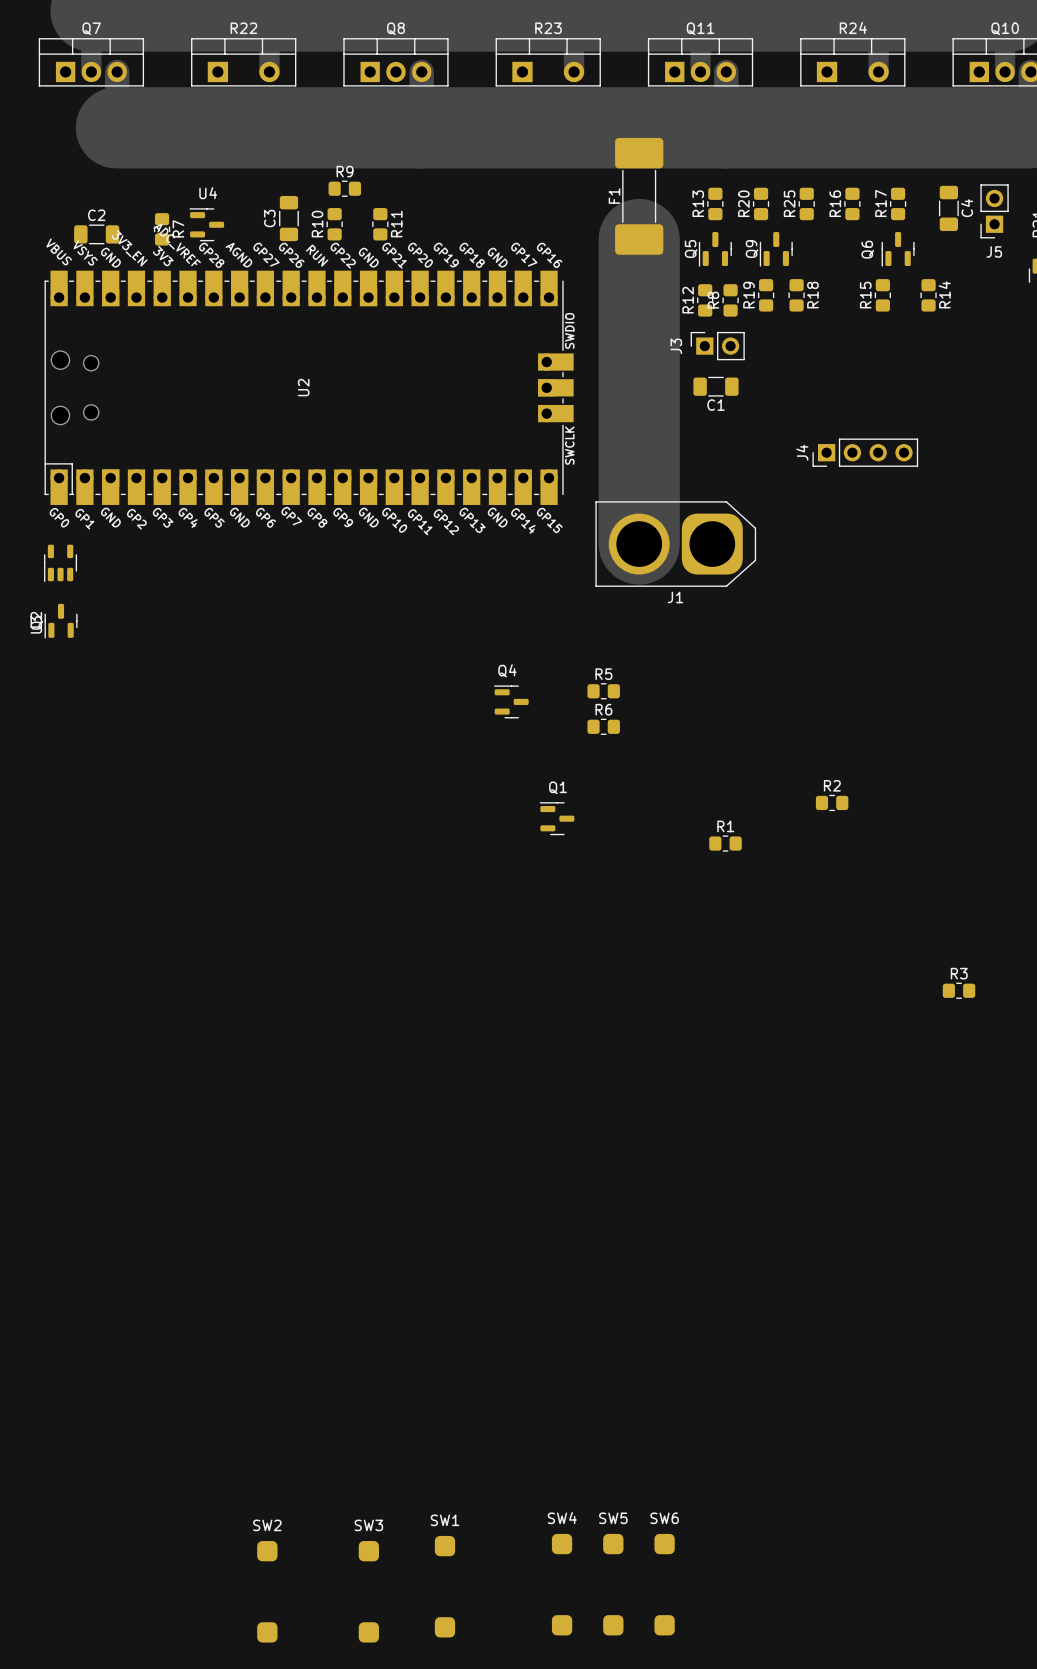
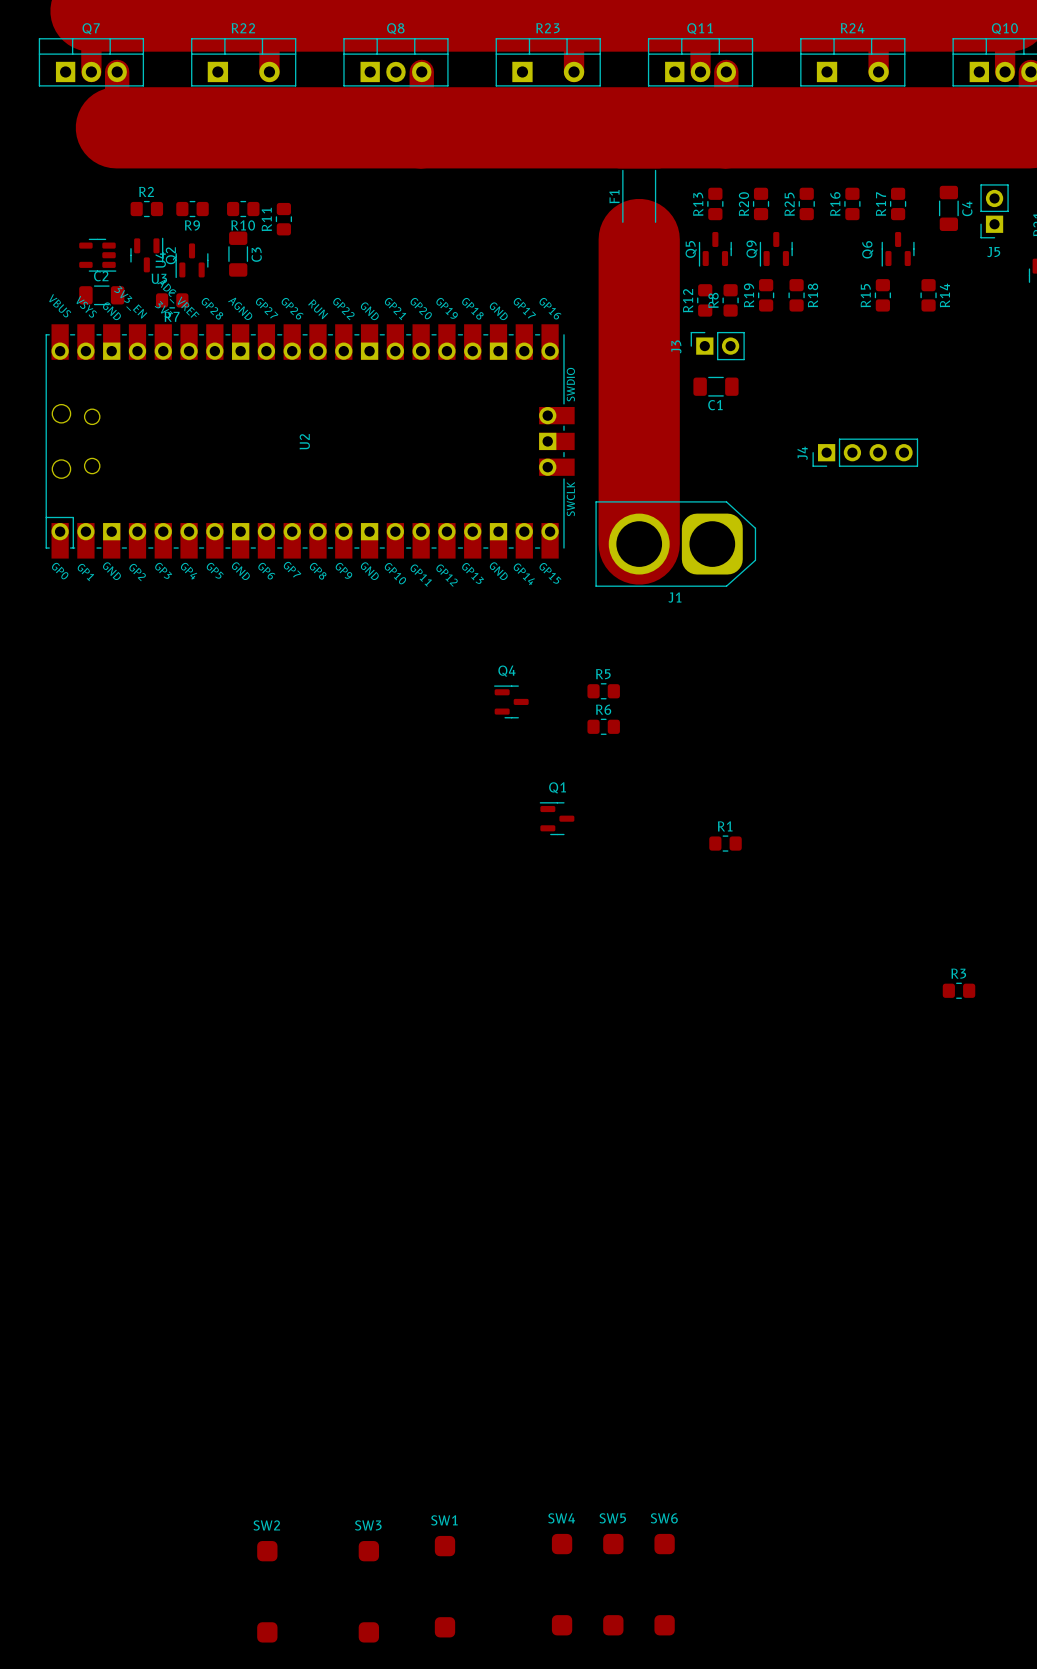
R9 name position: R9 (345, 171) -> R9 (192, 225)
R9 position: (344, 188) -> (192, 209)
C3 name position: C3 (269, 218) -> C3 (256, 254)
C3 position: (288, 218) -> (238, 254)
U4 rotation: 0° (206, 224) -> 90° counterclockwise (192, 260)
U4 position: (206, 224) -> (192, 260)
R10 name position: R10 (317, 224) -> R10 (243, 225)
R10 rotation: 0° (334, 224) -> 90° clockwise (243, 209)
R10 position: (334, 224) -> (243, 209)
R11 position: (380, 224) -> (283, 219)
R11 name position: R11 (396, 224) -> R11 (266, 219)
R7 rotation: 0° (162, 229) -> 90° clockwise (172, 300)
R7 position: (162, 229) -> (172, 300)
C2 position: (96, 234) -> (101, 295)
U2 position: (309, 387) -> (310, 441)
U3 rotation: 0° (60, 563) -> 90° counterclockwise (97, 255)
U3 position: (60, 563) -> (97, 255)
Q2 rotation: 0° (61, 621) -> 180° (146, 255)
Q2 position: (61, 621) -> (146, 255)
R2 position: (832, 802) -> (146, 209)

